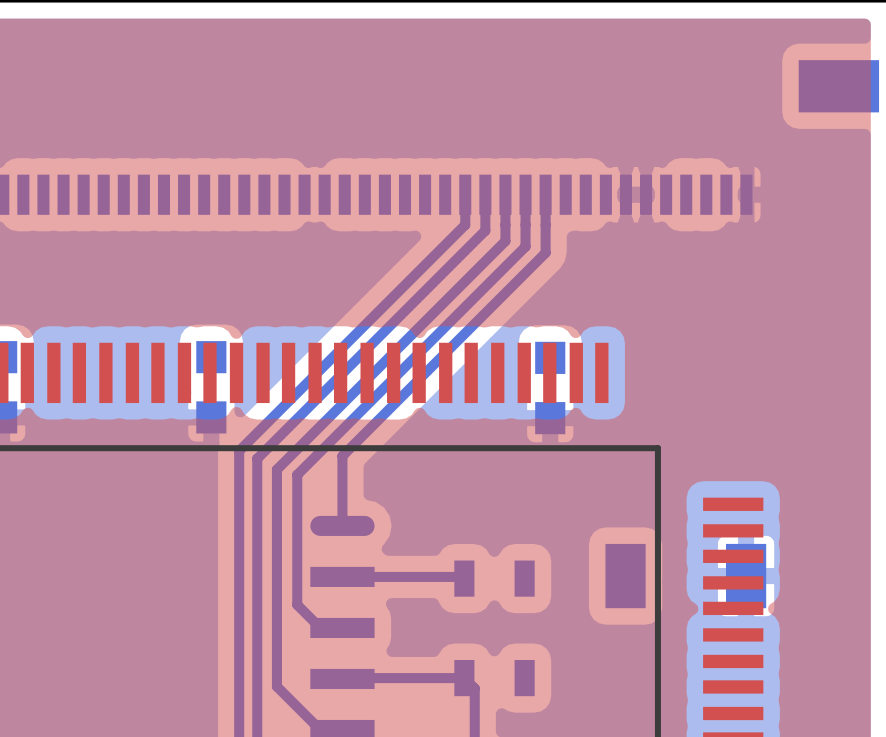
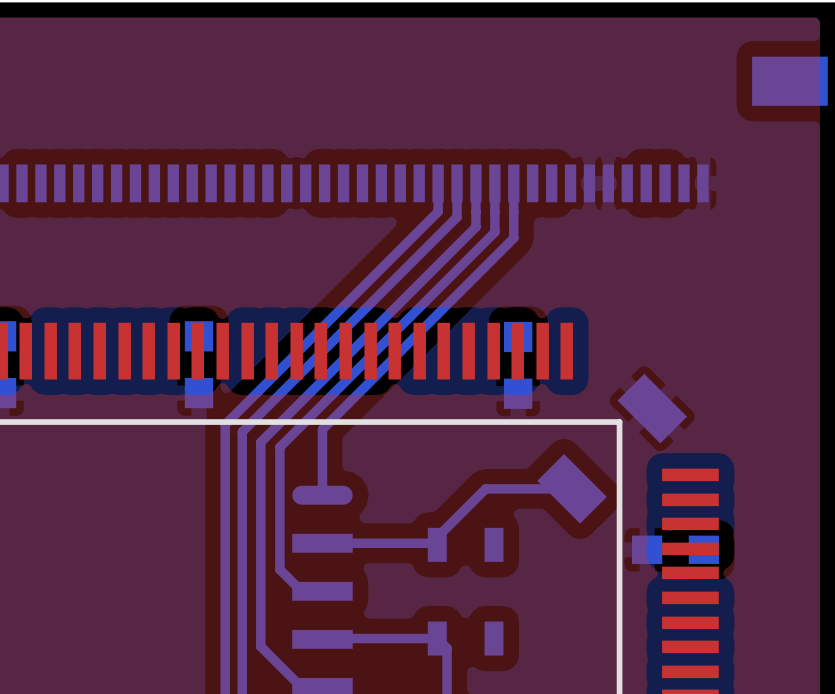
part: none -> (612, 448)
bottom track: none -> (572, 488) (485, 488) (437, 537)
part footprint: [605, 543, 767, 609] -> [632, 535, 720, 564]

